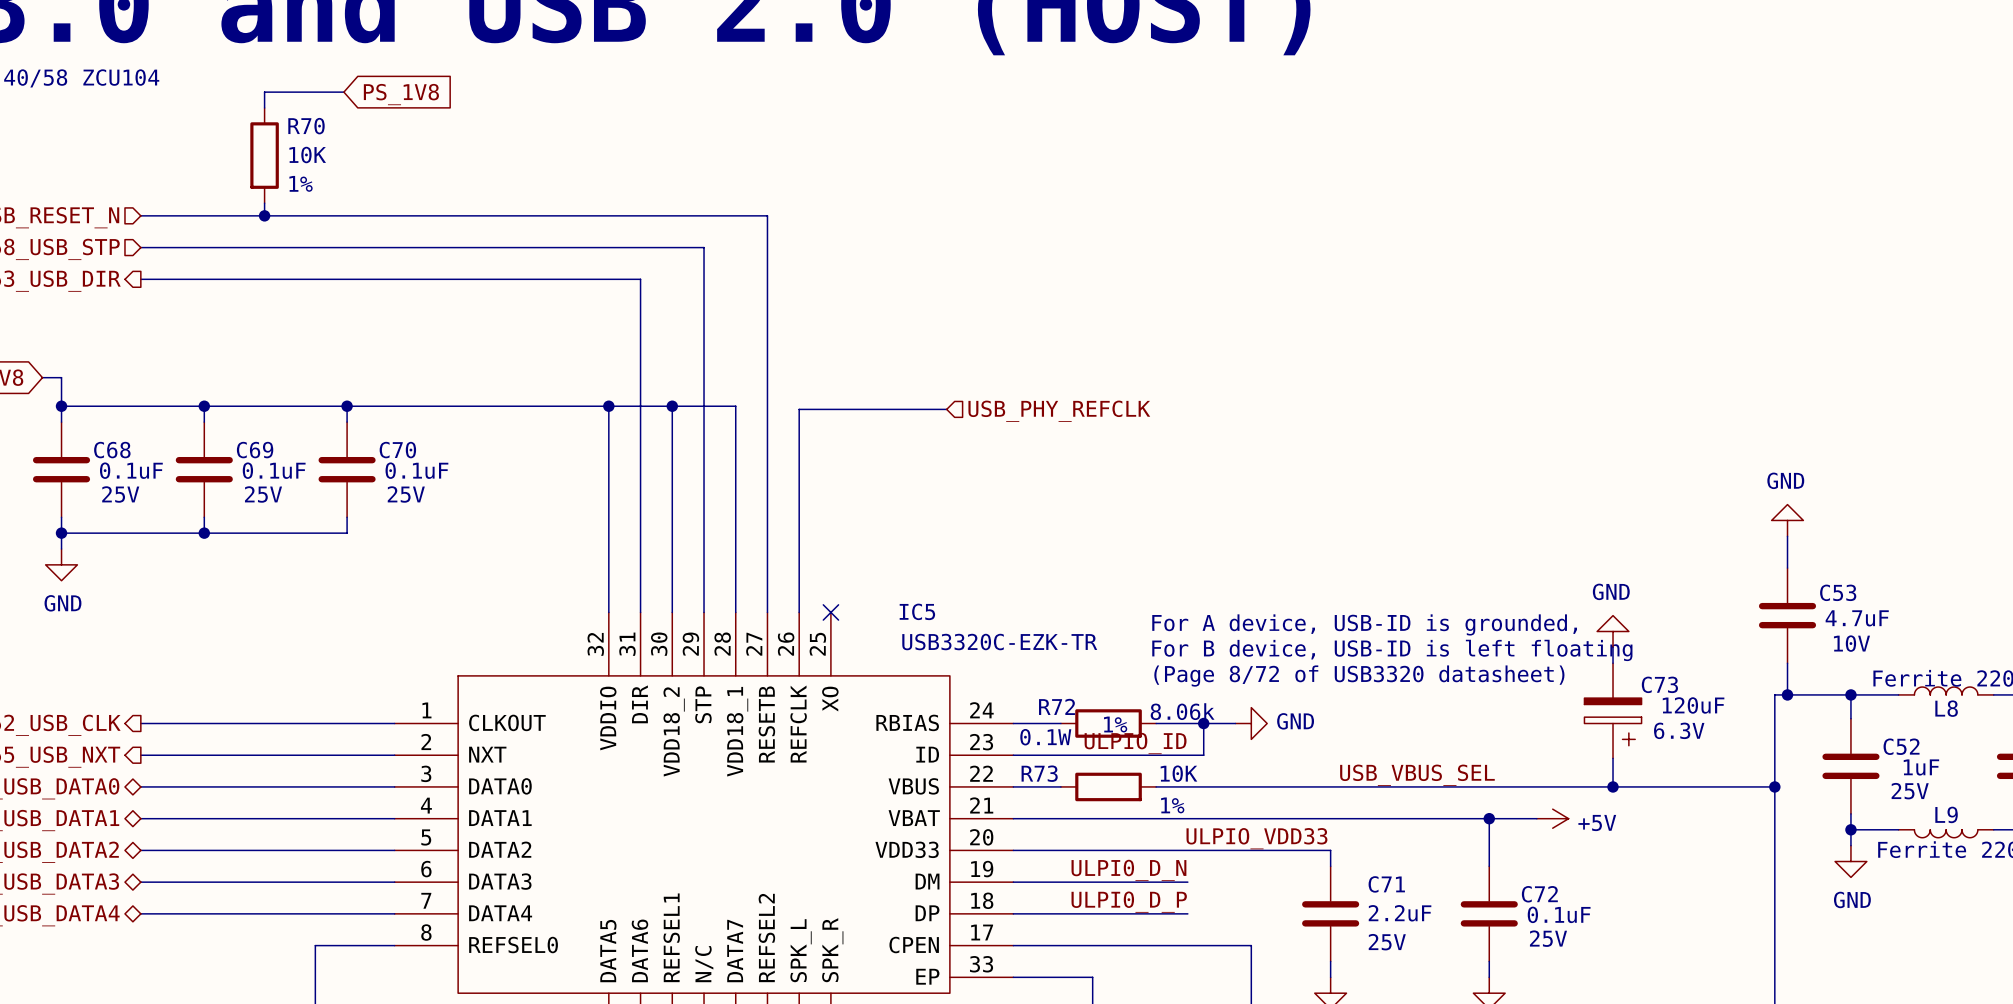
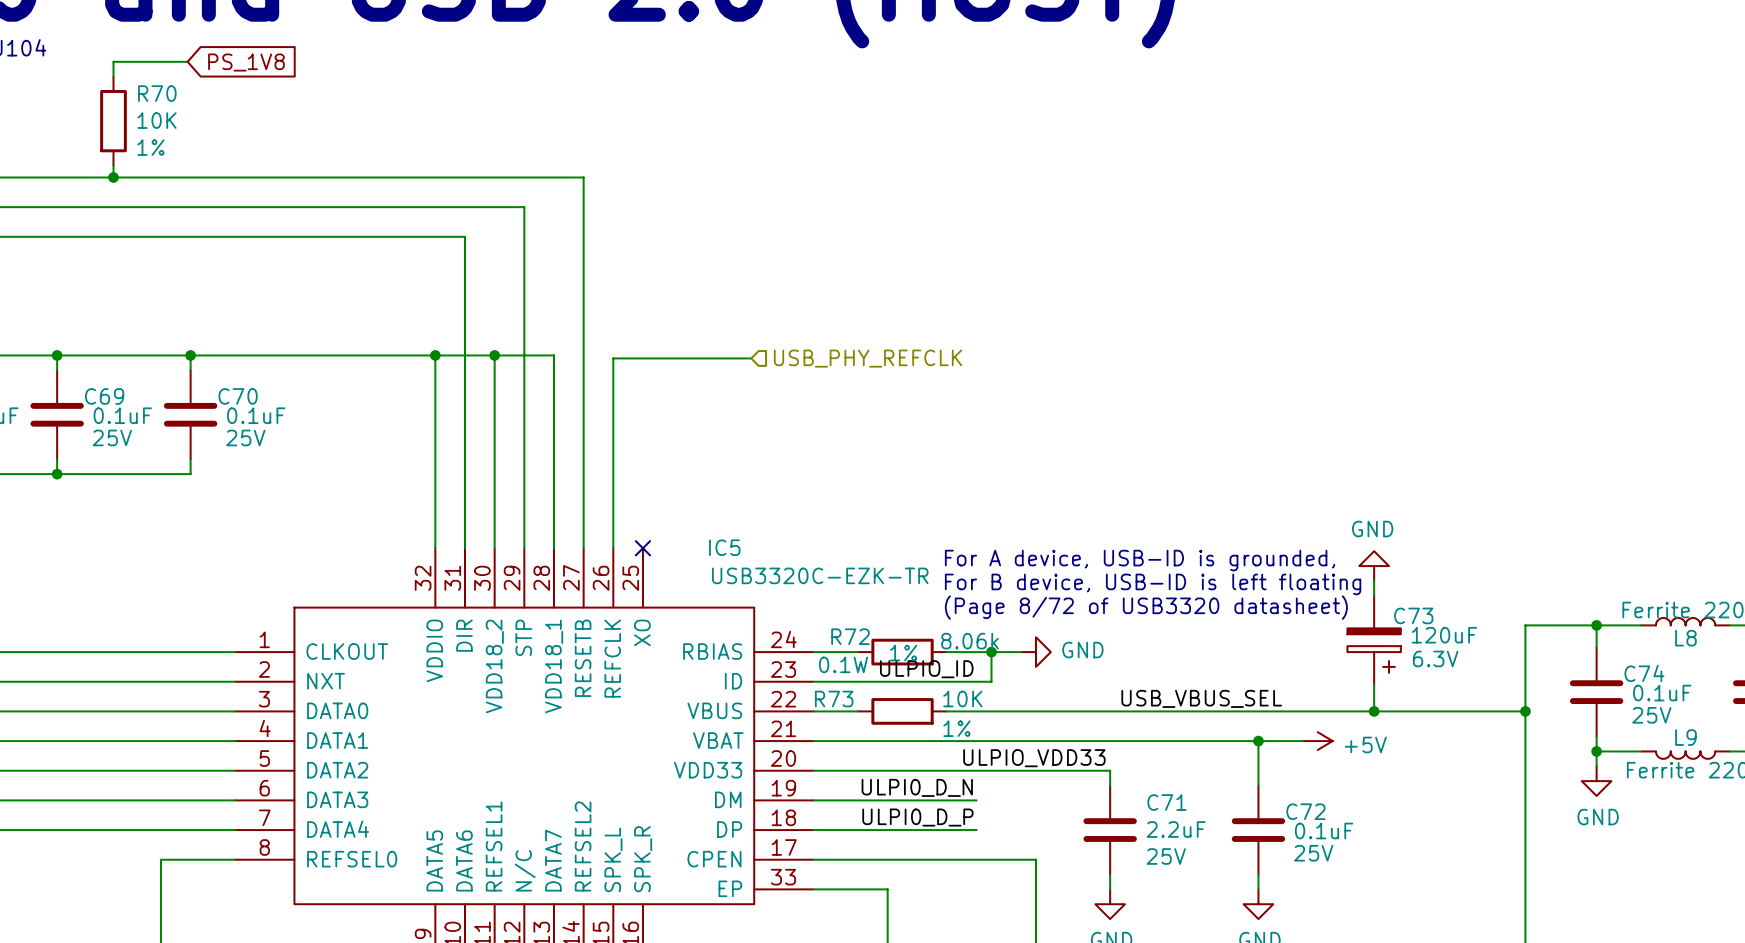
power symbol: GND (1787, 520) -> none
wire: (1787, 536) (1787, 568) -> none
C53: 4.7uF (1787, 615) -> none
wire: (1787, 663) (1787, 694) -> none
junction: (1787, 694) -> none
C52 name: C52 (1901, 746) -> C74 (1644, 673)
C52 value: 1uF (1921, 767) -> 0.1uF (1662, 693)

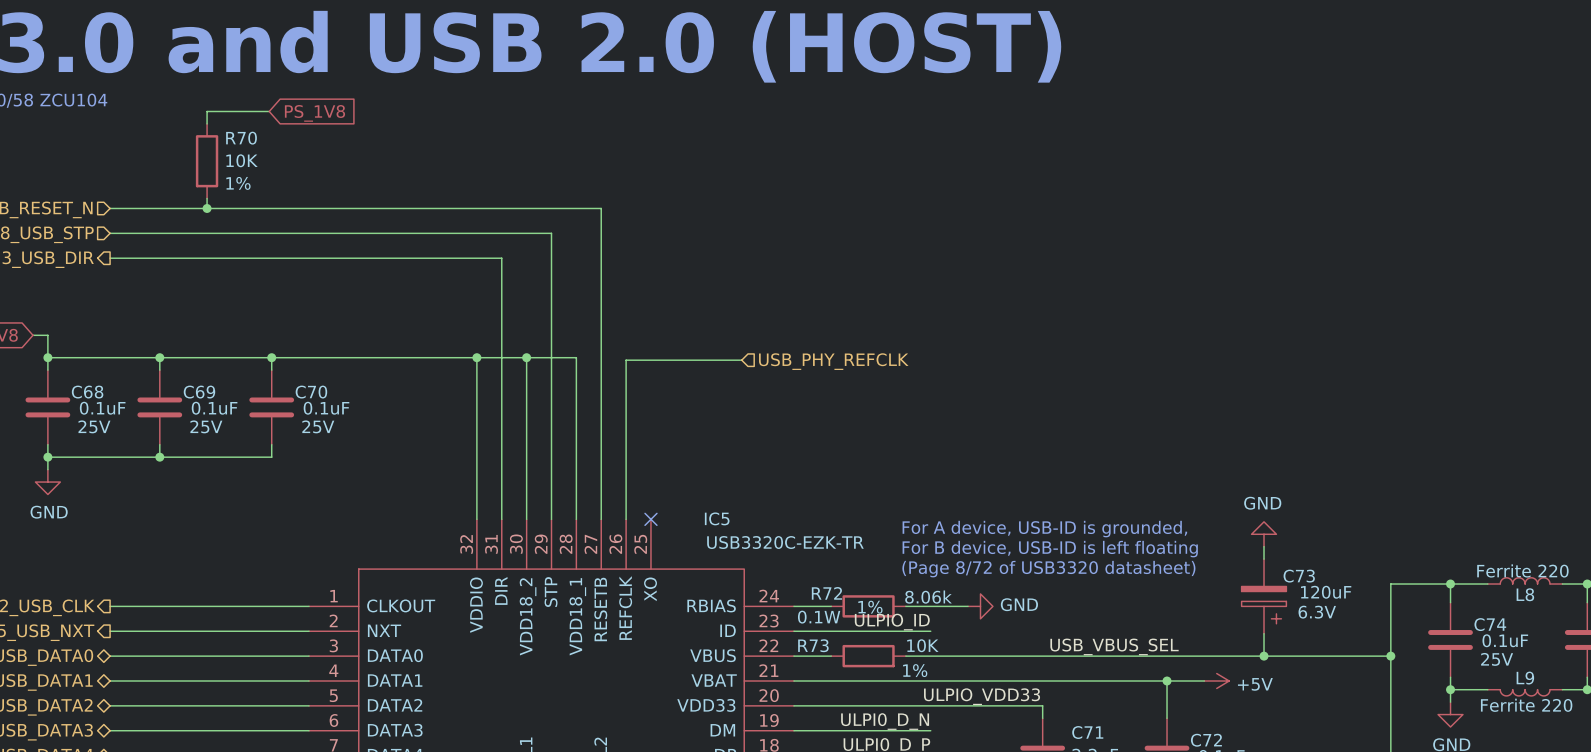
wire: (991, 652) (991, 681) (976, 681) -> none
junction: (991, 652) -> none

